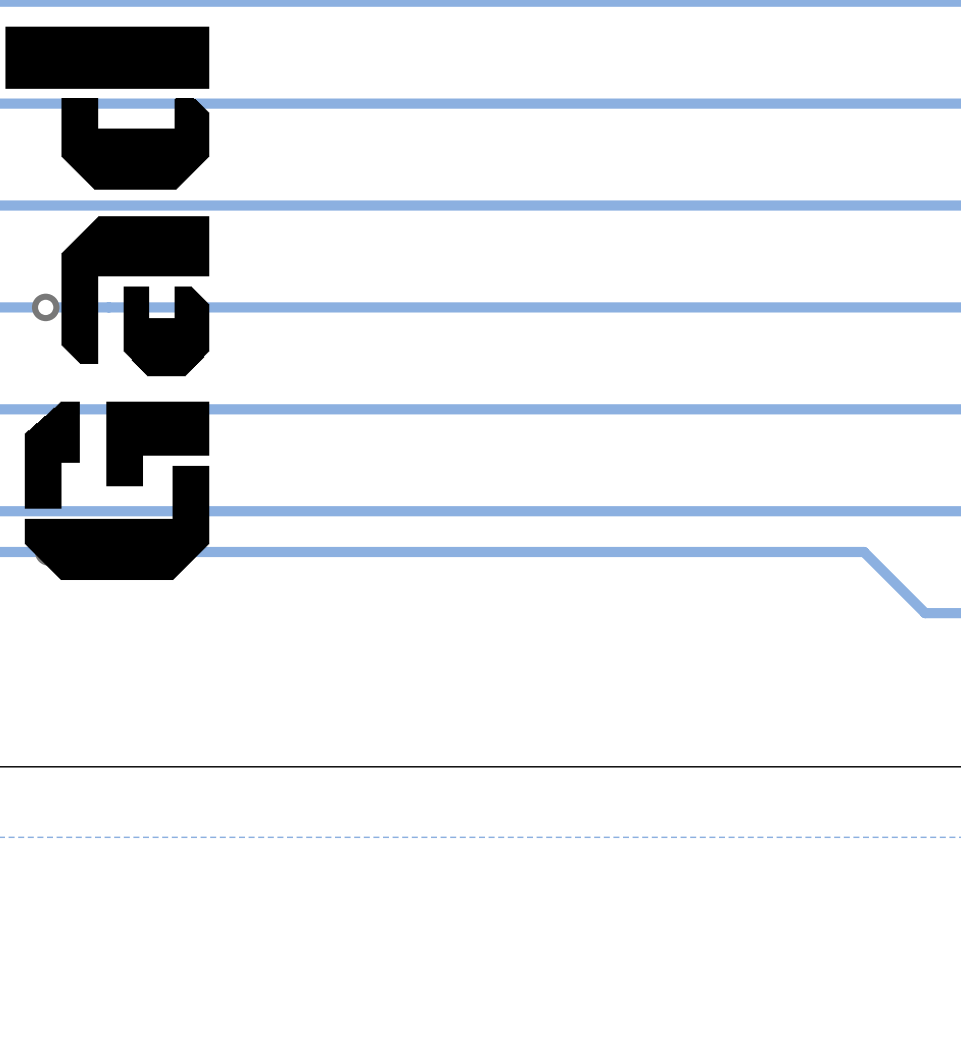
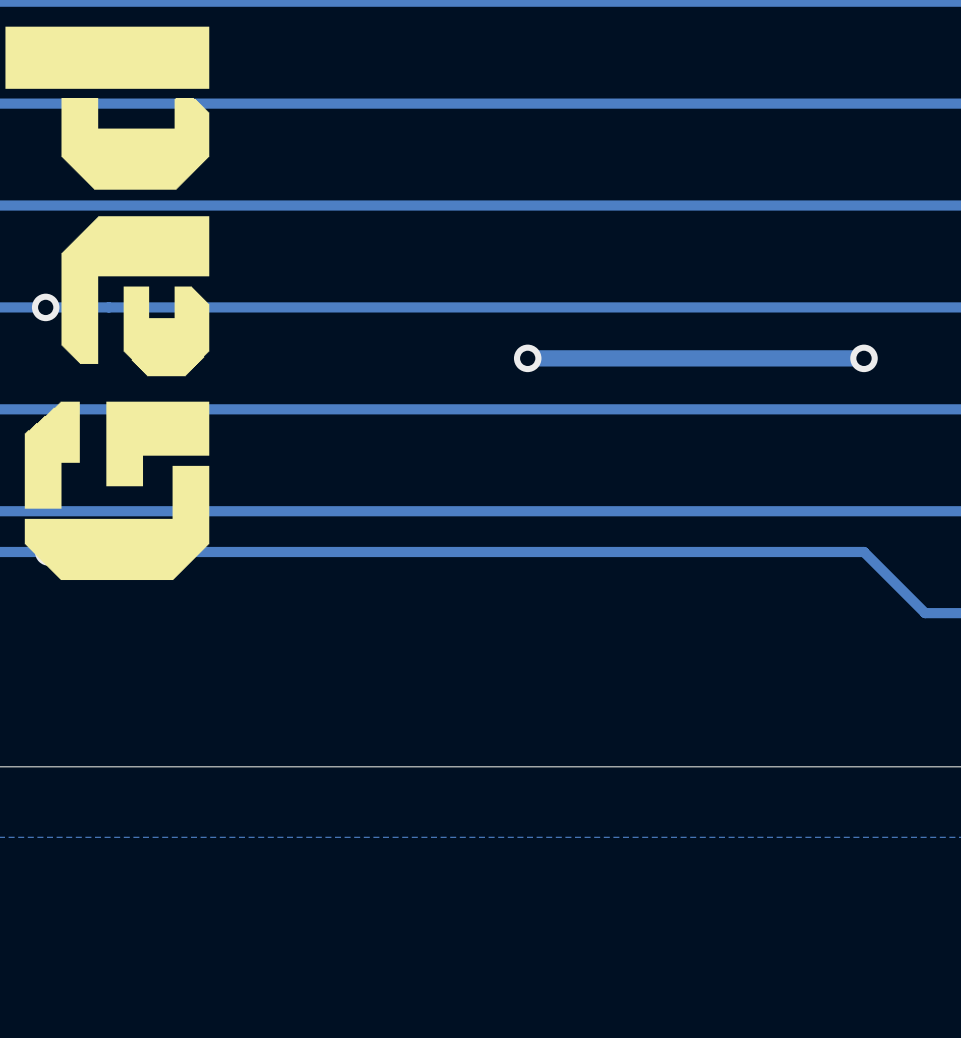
via: none -> (527, 358)
track: none -> (864, 358) (527, 358)
via: none -> (864, 358)

